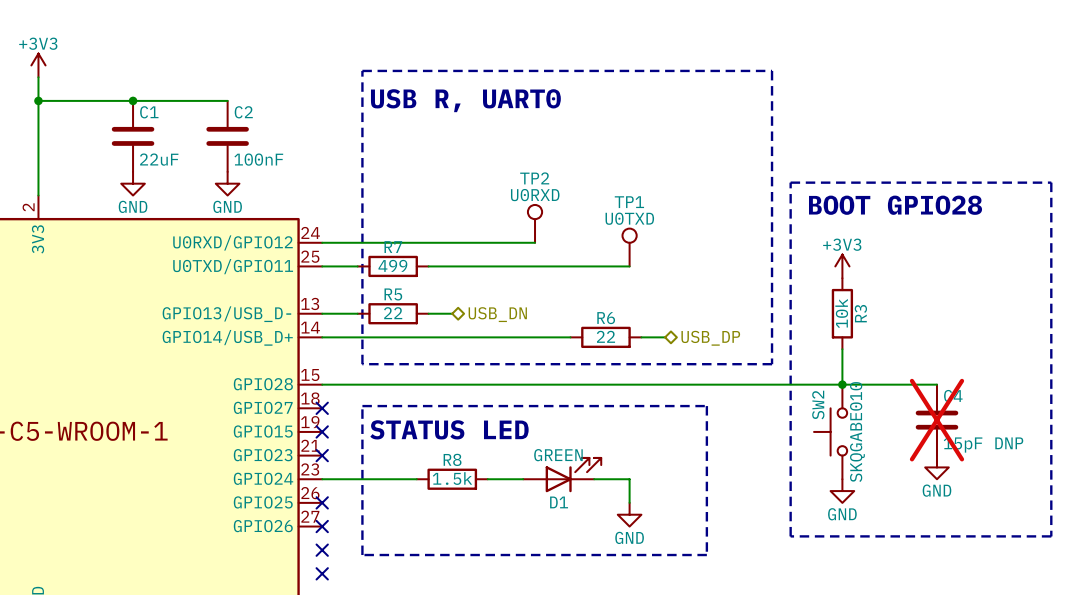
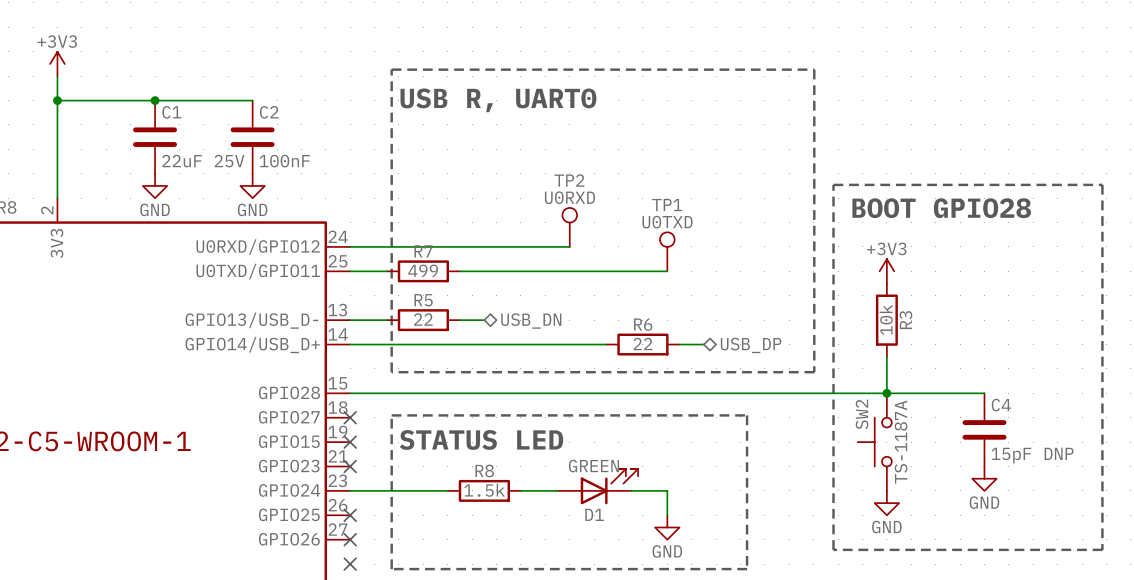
C1 value: 22uF (159, 159) -> 22uF 25V (203, 161)
C4 do-not-place cross: (936, 420) -> none
SW2 value: SKQGABE010 (857, 432) -> TS-1187A (901, 442)

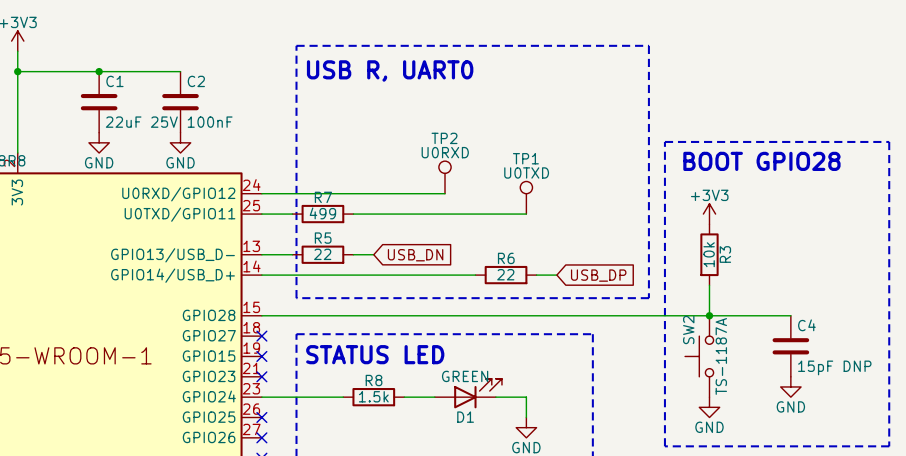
global label: none -> USB_DN (415, 255)
hierarchical label: USB_DN (531, 321) -> none
global label: none -> USB_DP (598, 275)
hierarchical label: USB_DP (751, 345) -> none

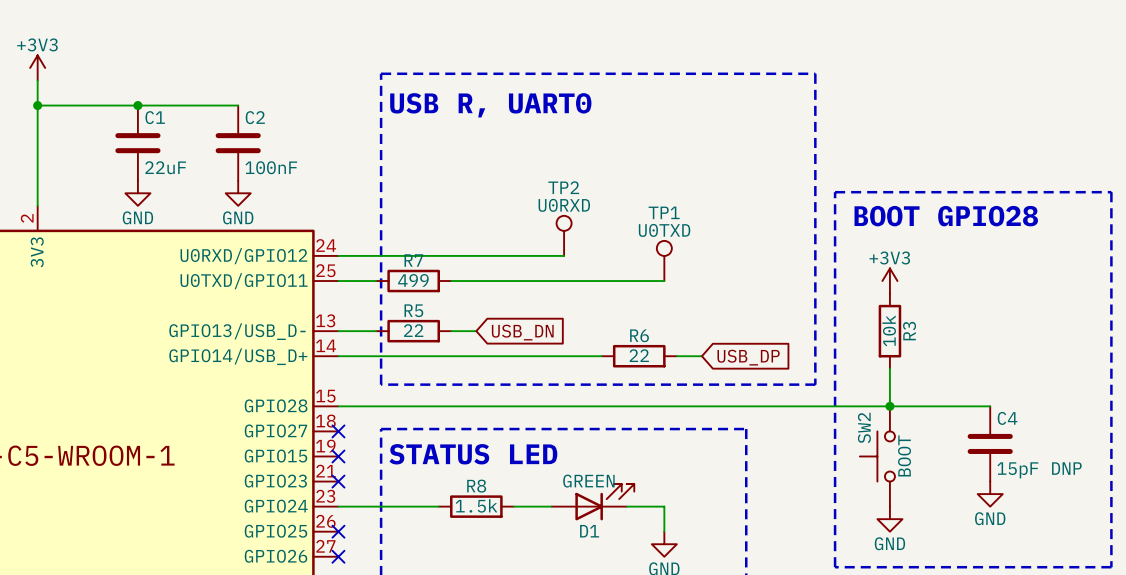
C1 value: 22uF 25V (141, 122) -> 22uF (165, 167)
SW2 value: TS-1187A (721, 356) -> BOOT (904, 455)

